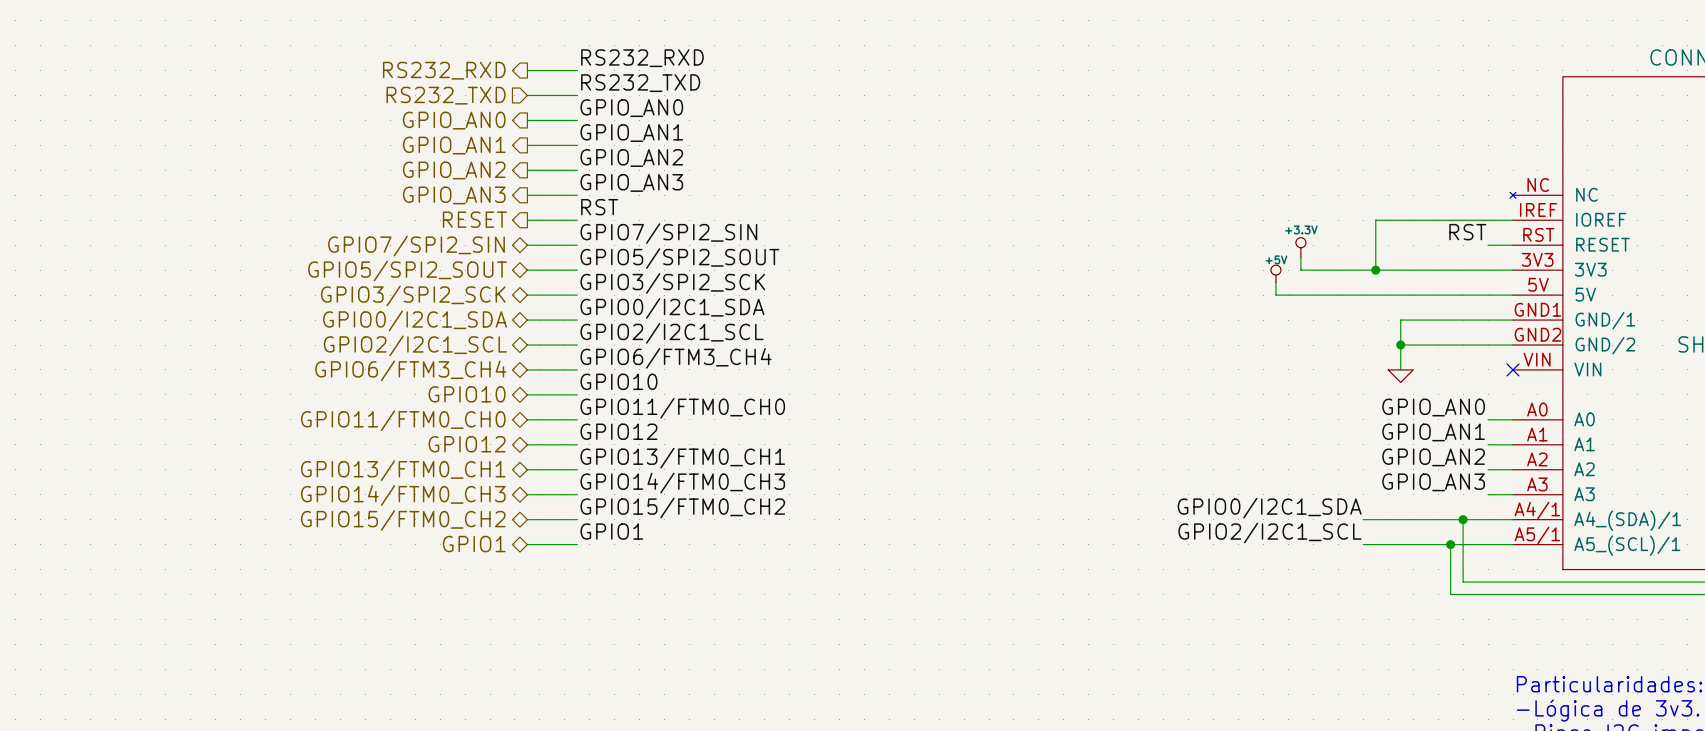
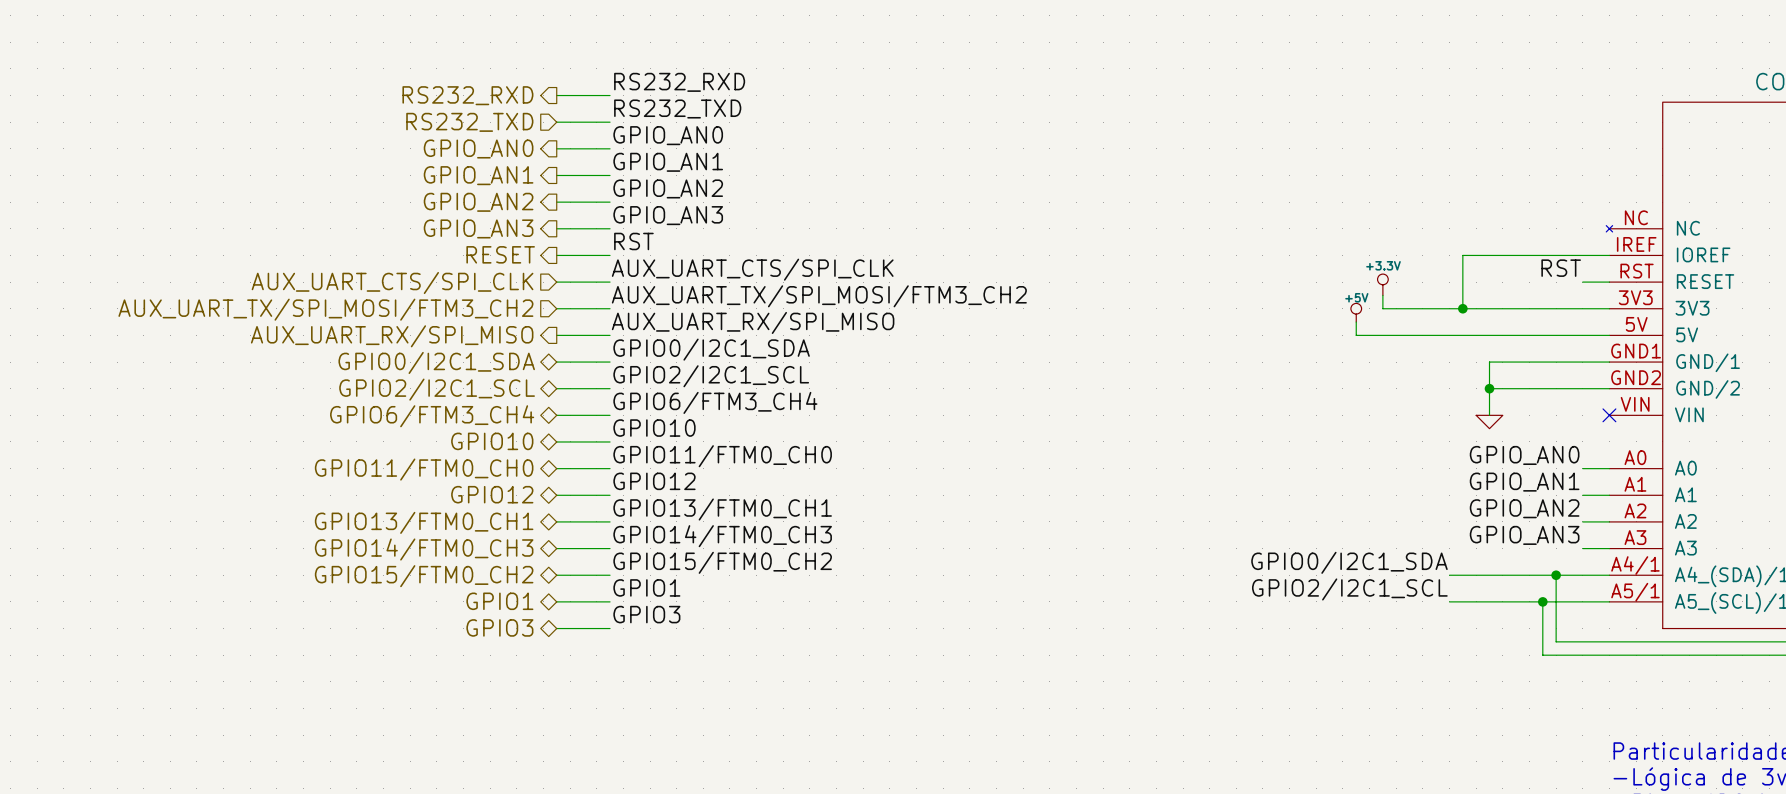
label: GPIO7/SPI2_SIN (668, 233) -> AUX_UART_CTS/SPI_CLK (752, 269)
hierarchical label shape: bidirectional (416, 246) -> input (392, 283)
hierarchical label: GPIO7/SPI2_SIN (416, 246) -> AUX_UART_CTS/SPI_CLK (392, 283)
label: GPIO5/SPI2_SOUT (679, 258) -> AUX_UART_TX/SPI_MOSI/FTM3_CH2 (819, 296)
hierarchical label shape: bidirectional (407, 271) -> input (325, 309)
hierarchical label: GPIO5/SPI2_SOUT (407, 271) -> AUX_UART_TX/SPI_MOSI/FTM3_CH2 (325, 309)
label: GPIO3/SPI2_SCK (672, 283) -> AUX_UART_RX/SPI_MISO (753, 322)
hierarchical label shape: bidirectional (413, 295) -> output (392, 336)
hierarchical label: GPIO3/SPI2_SCK (413, 295) -> AUX_UART_RX/SPI_MISO (392, 336)
label: none -> GPIO3 (646, 614)
hierarchical label: none -> GPIO3 (499, 627)
wire: none -> (556, 628) (610, 628)

